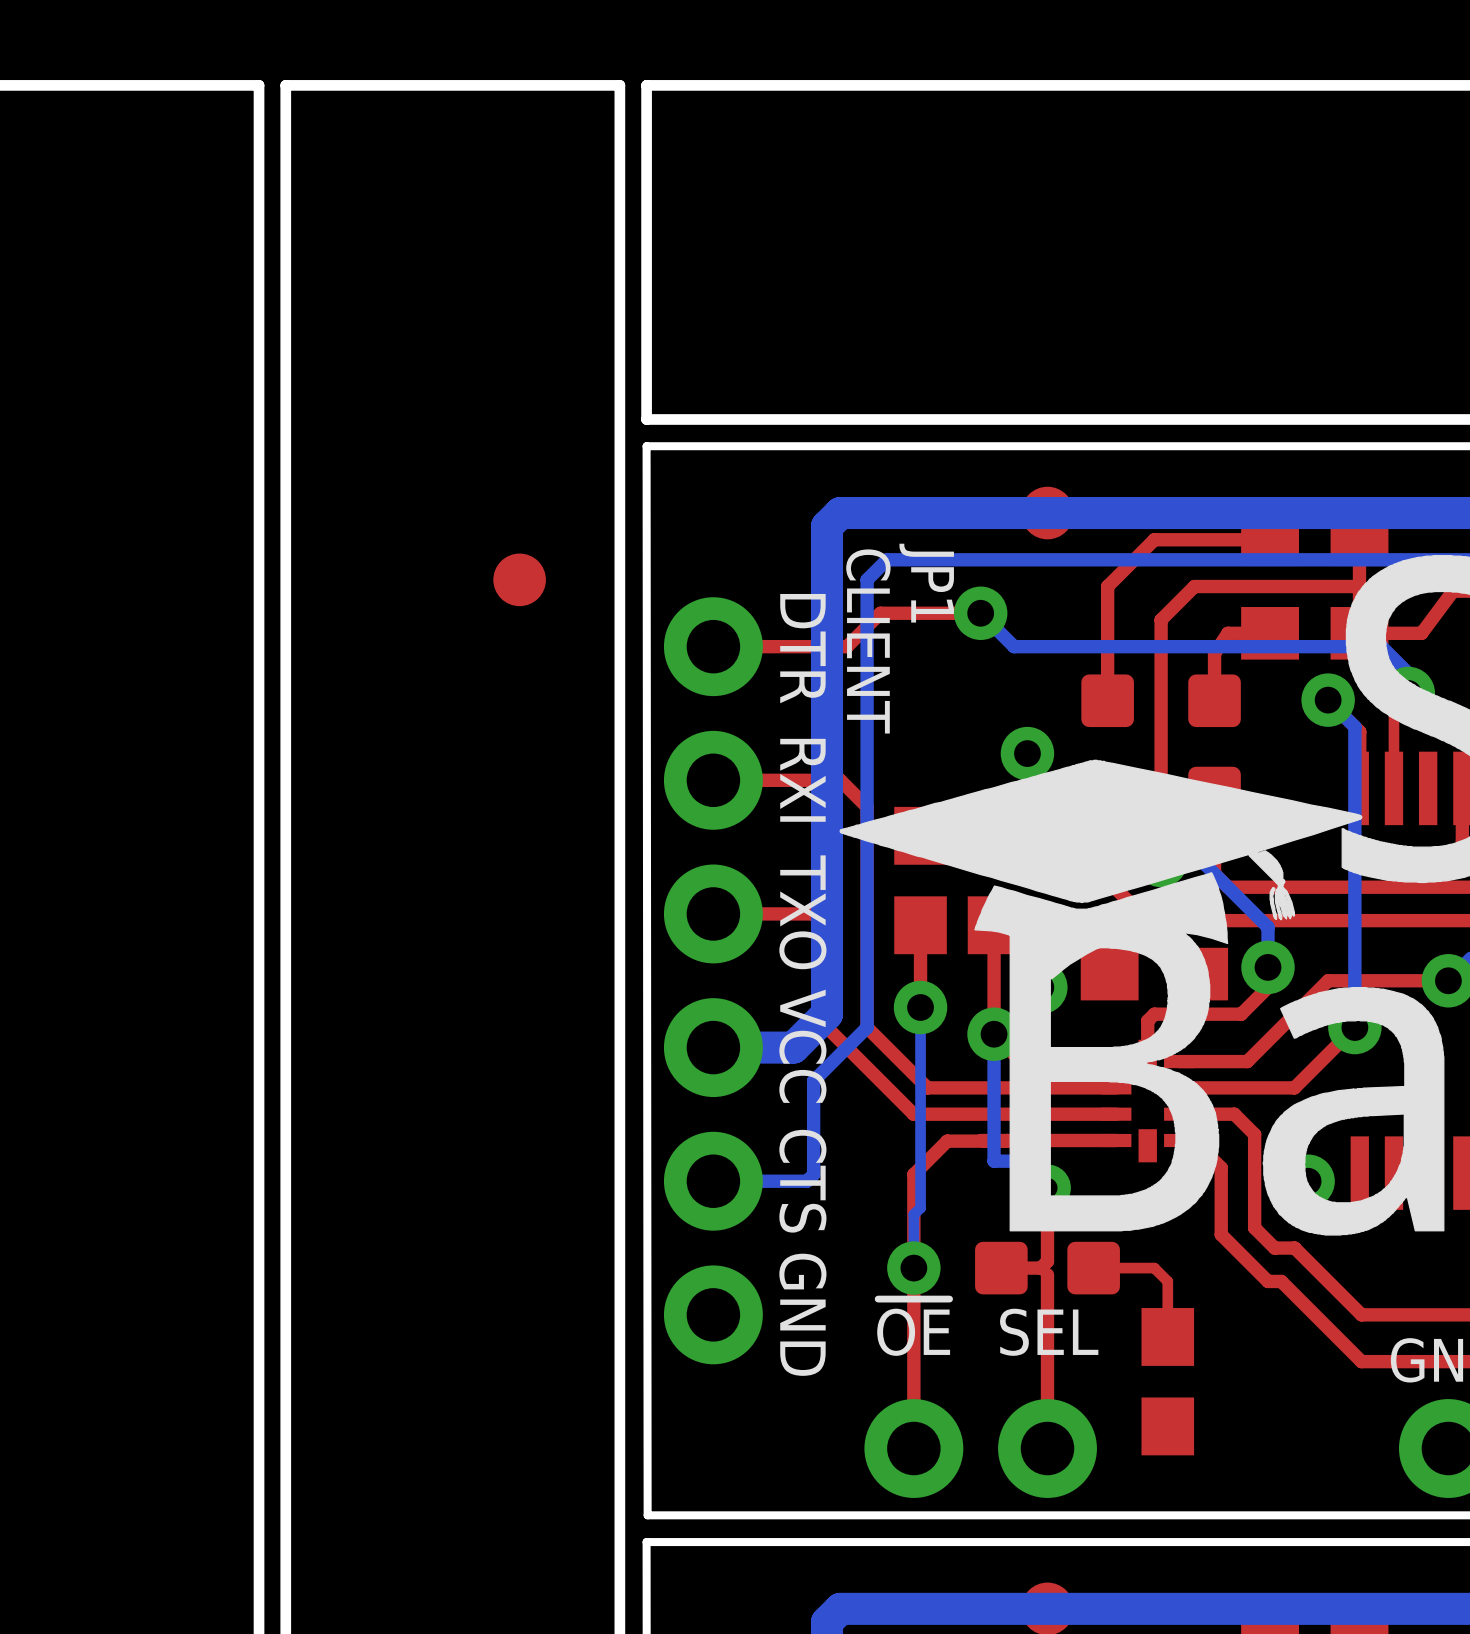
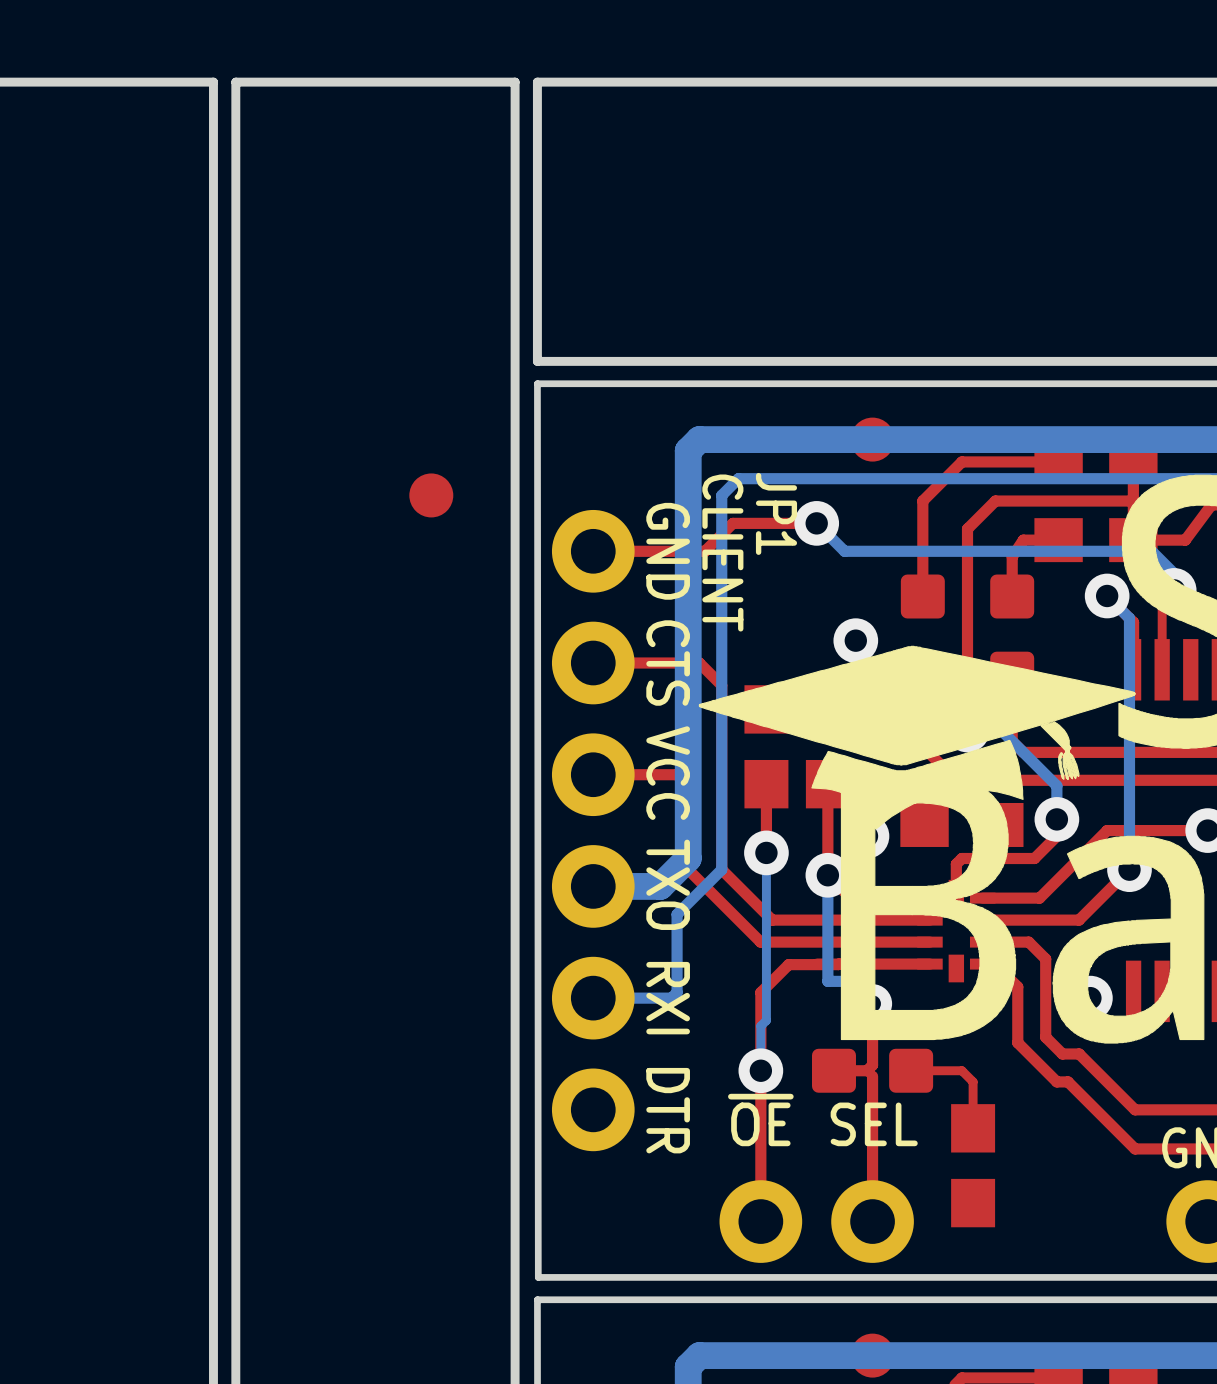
text: DTR (802, 648) -> GND (668, 551)
text: RXI (802, 780) -> CTS (668, 663)
text: TXO (802, 912) -> VCC (668, 773)
text: VCC (802, 1046) -> TXO (668, 884)
text: CTS (802, 1181) -> RXI (668, 998)
text: GND (802, 1314) -> DTR (668, 1110)

